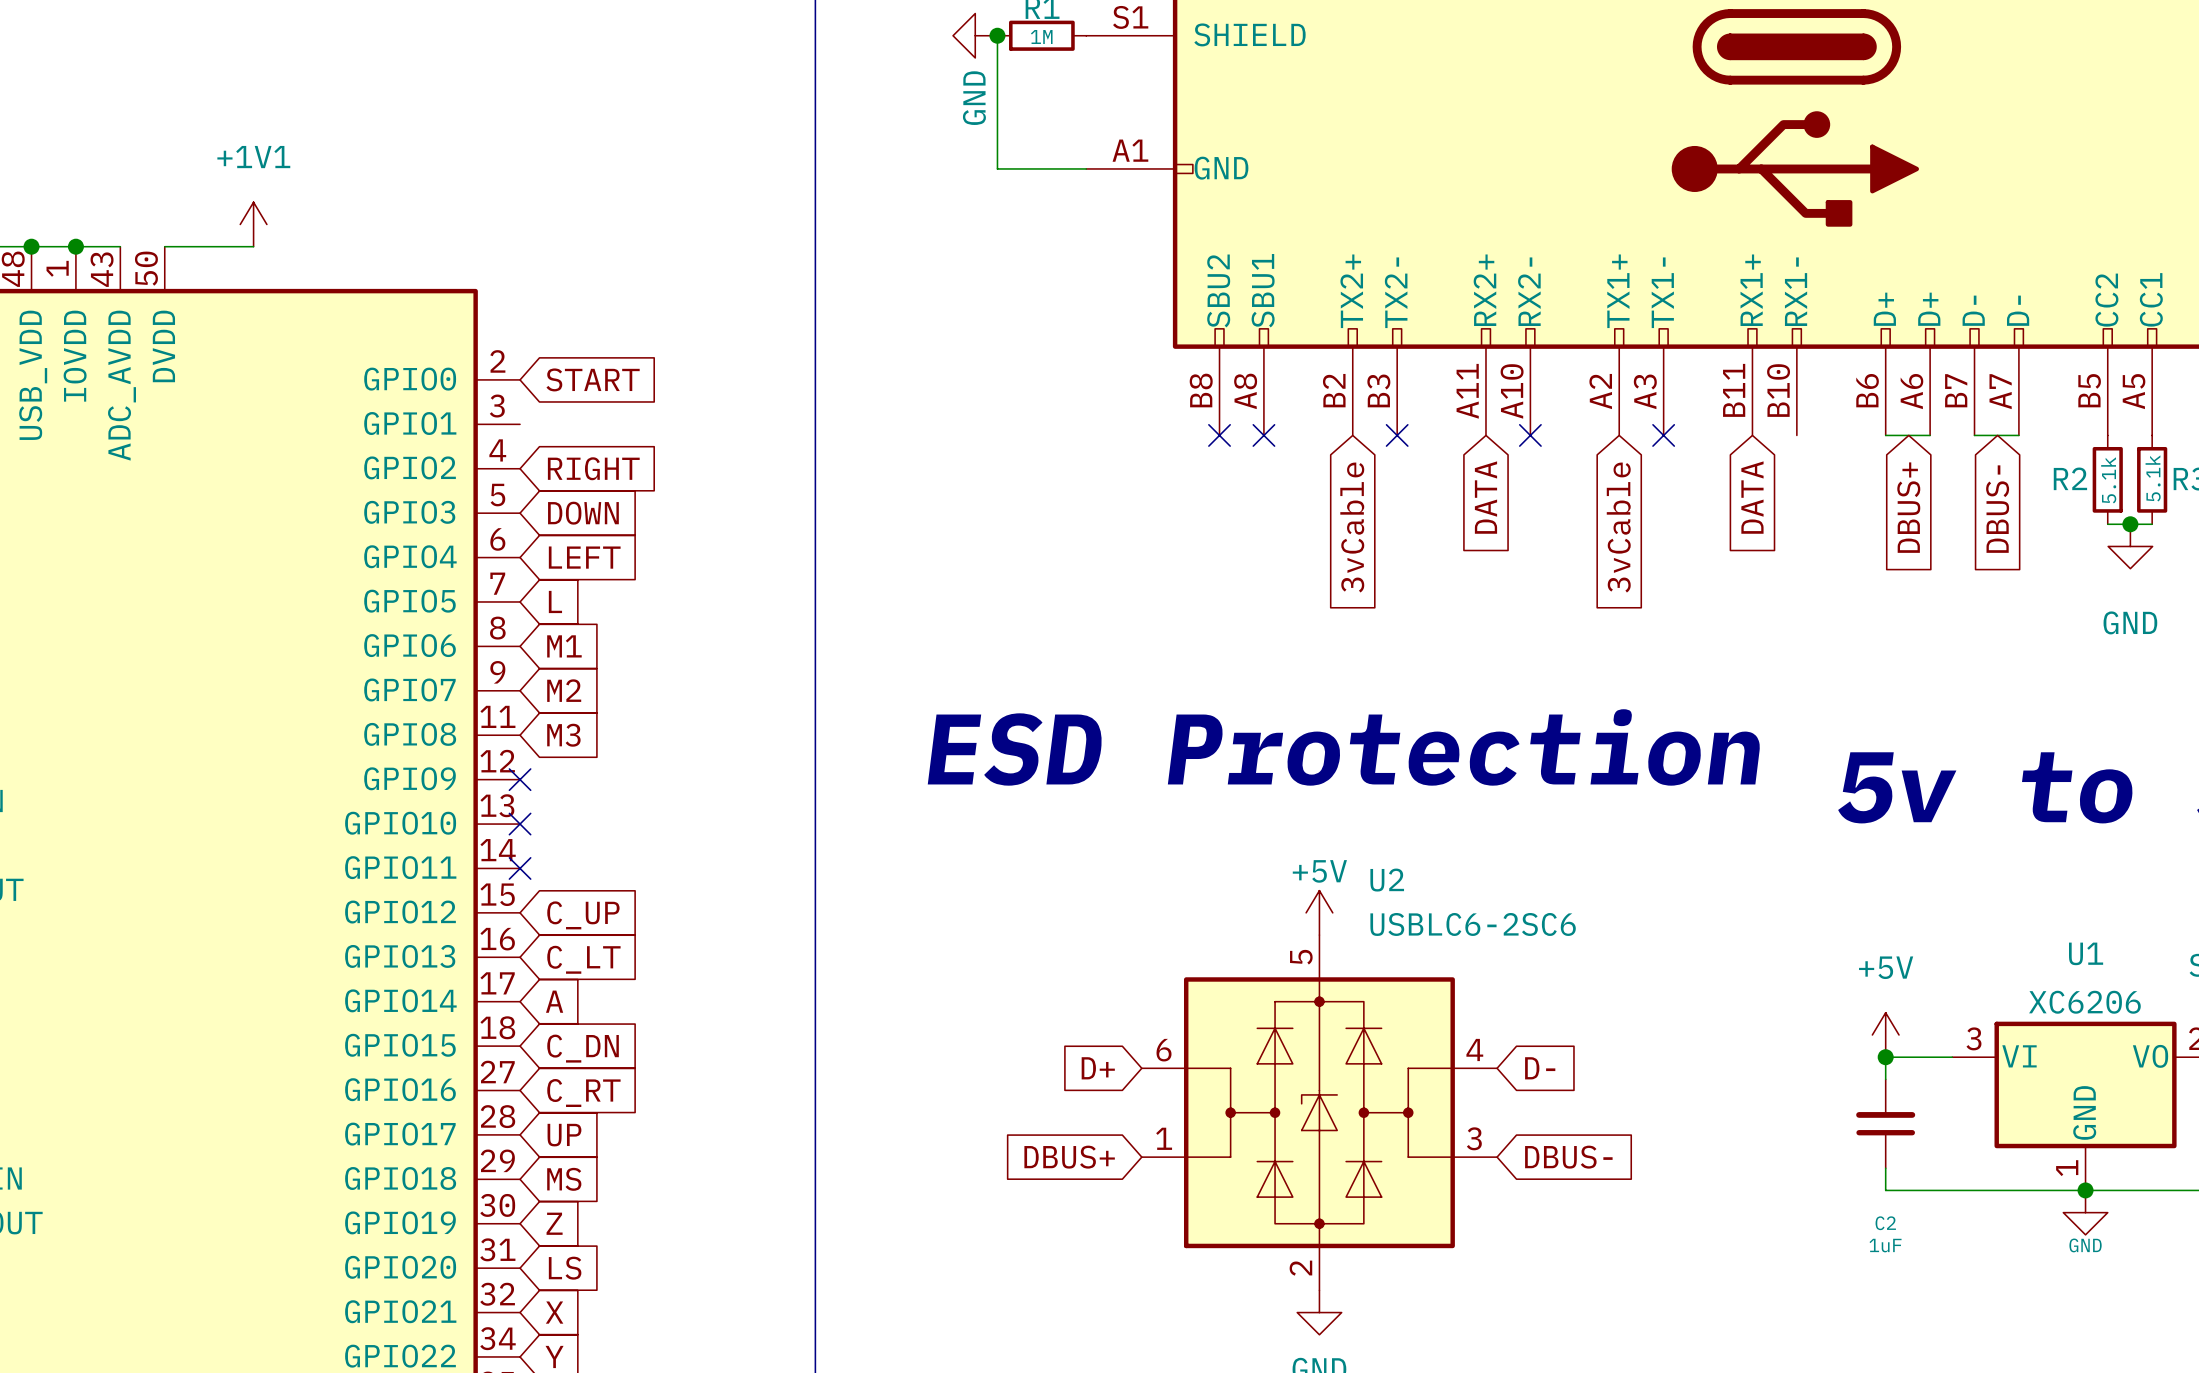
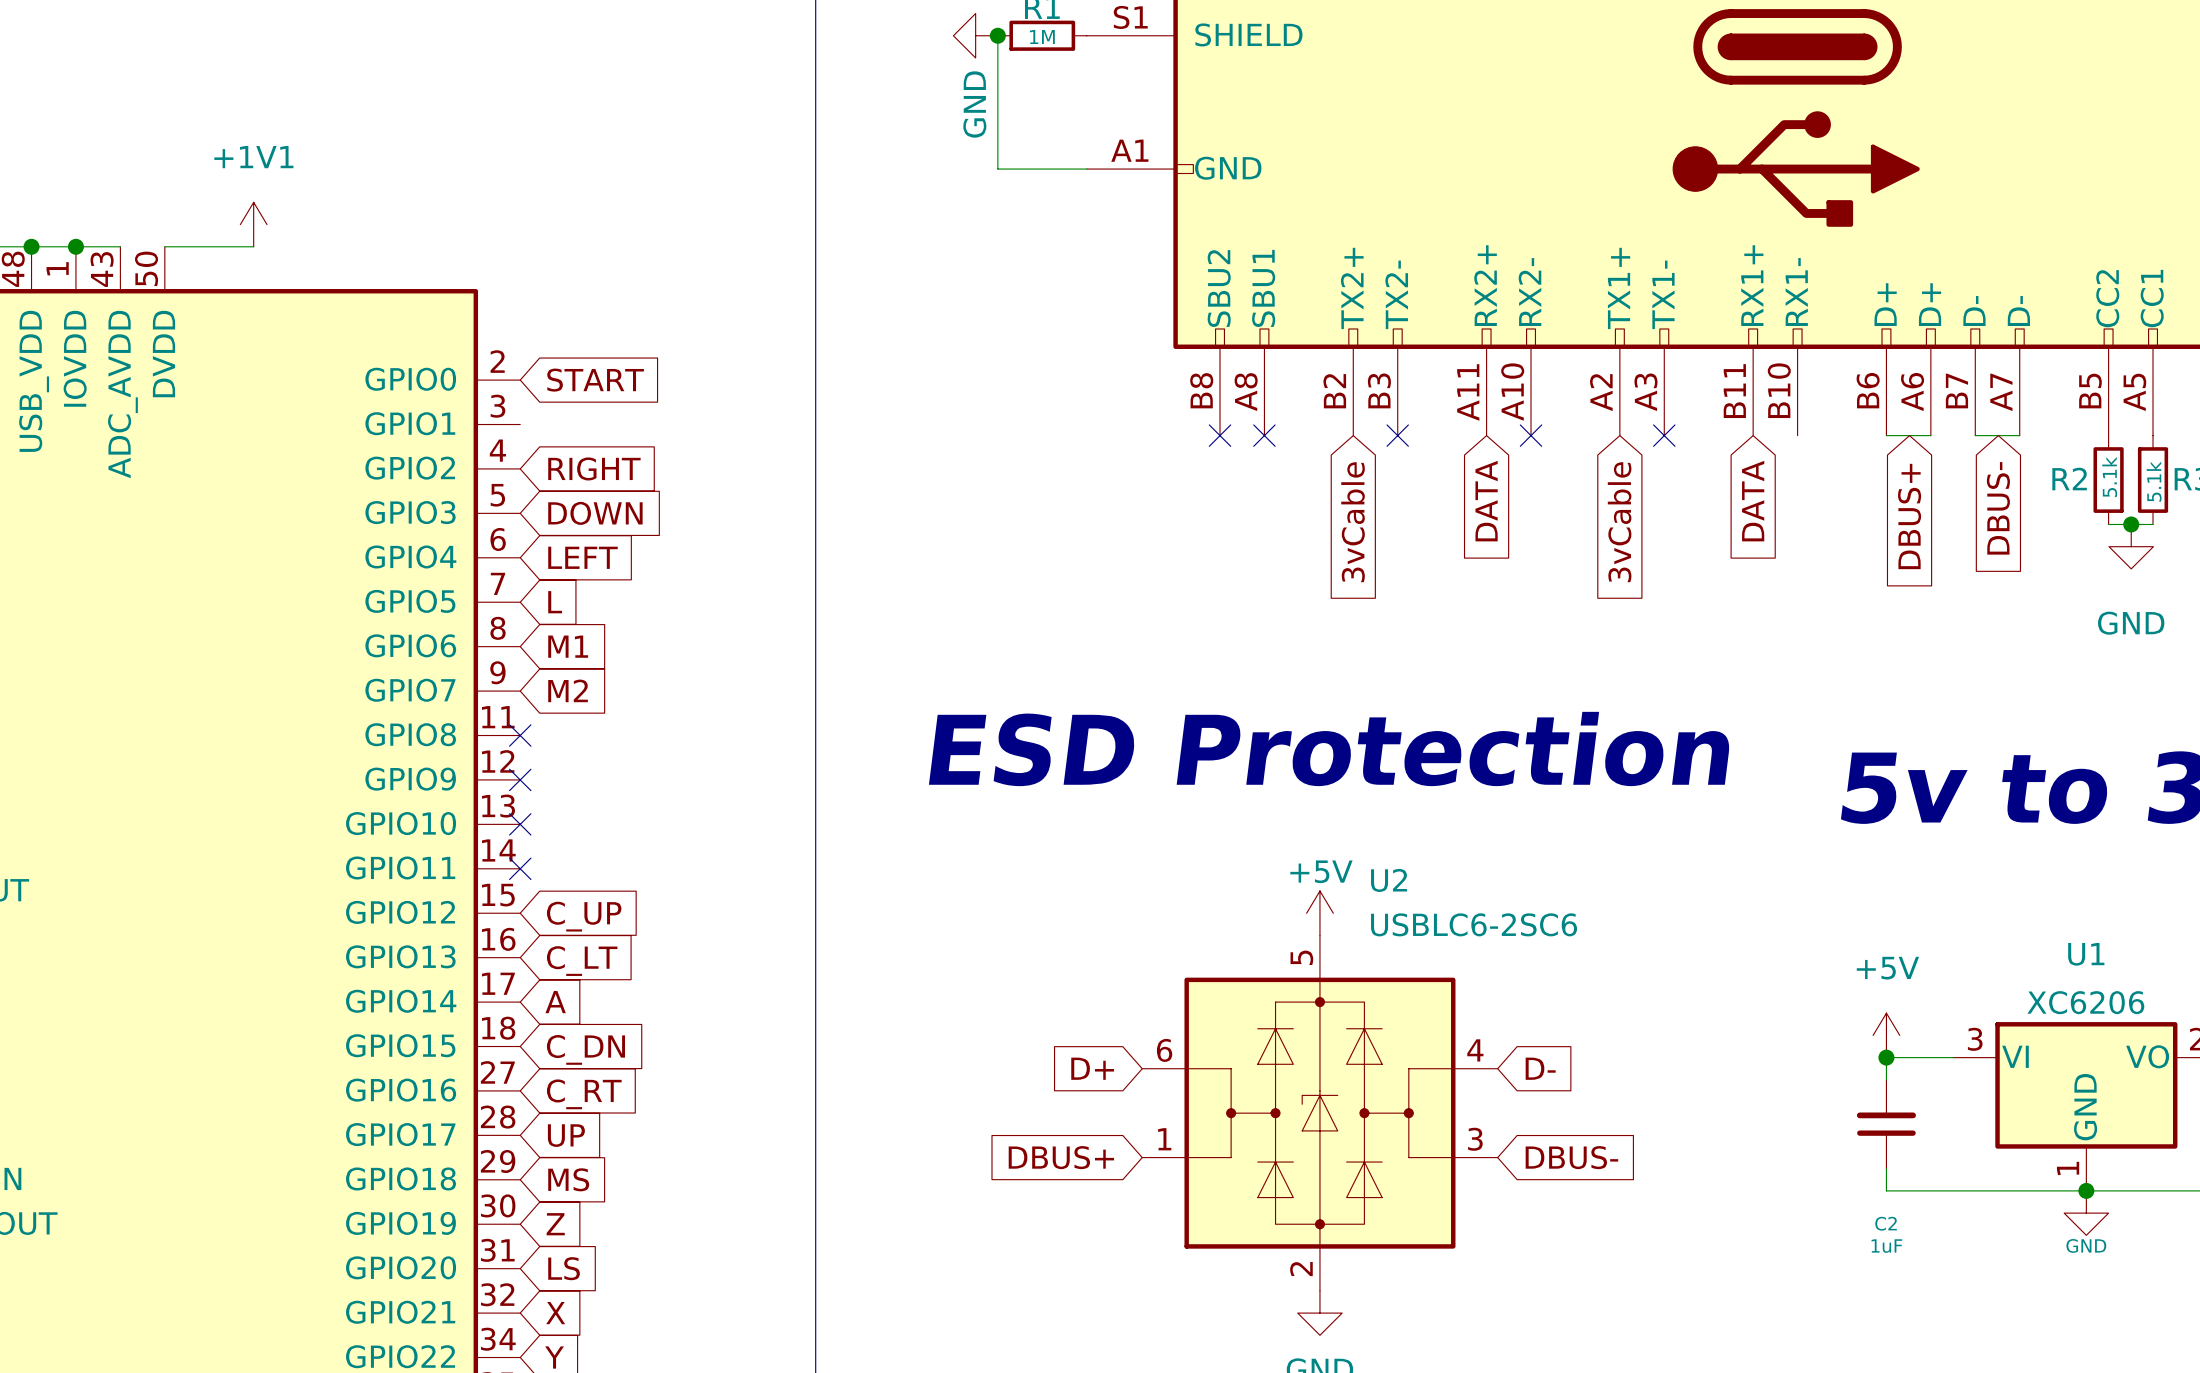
no-connect mark: none -> (520, 735)
global label: M3 (563, 735) -> none

